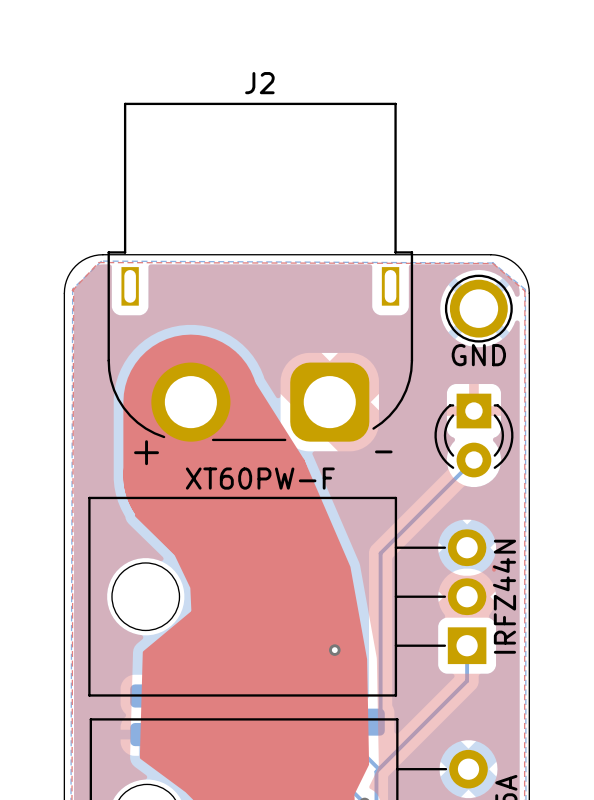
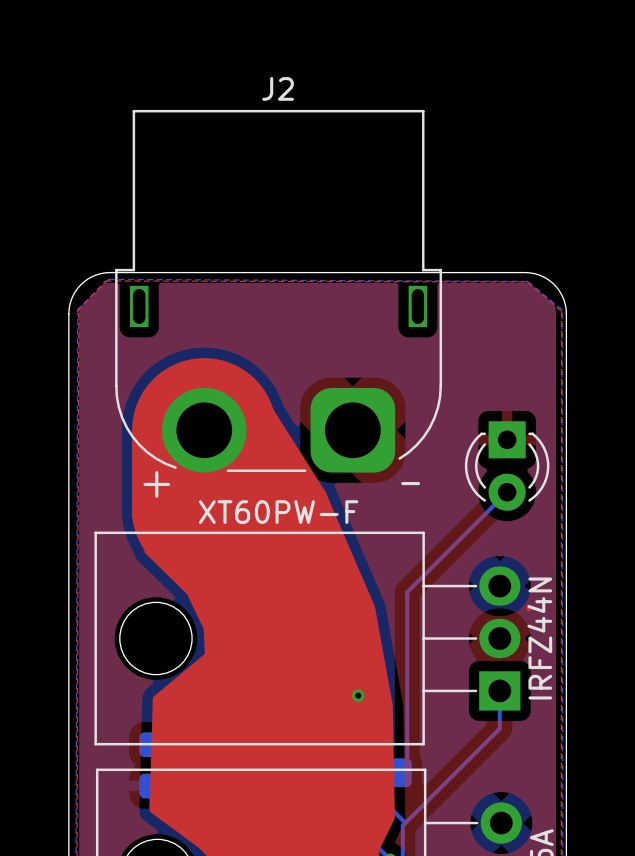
part: GND (478, 308) -> none

